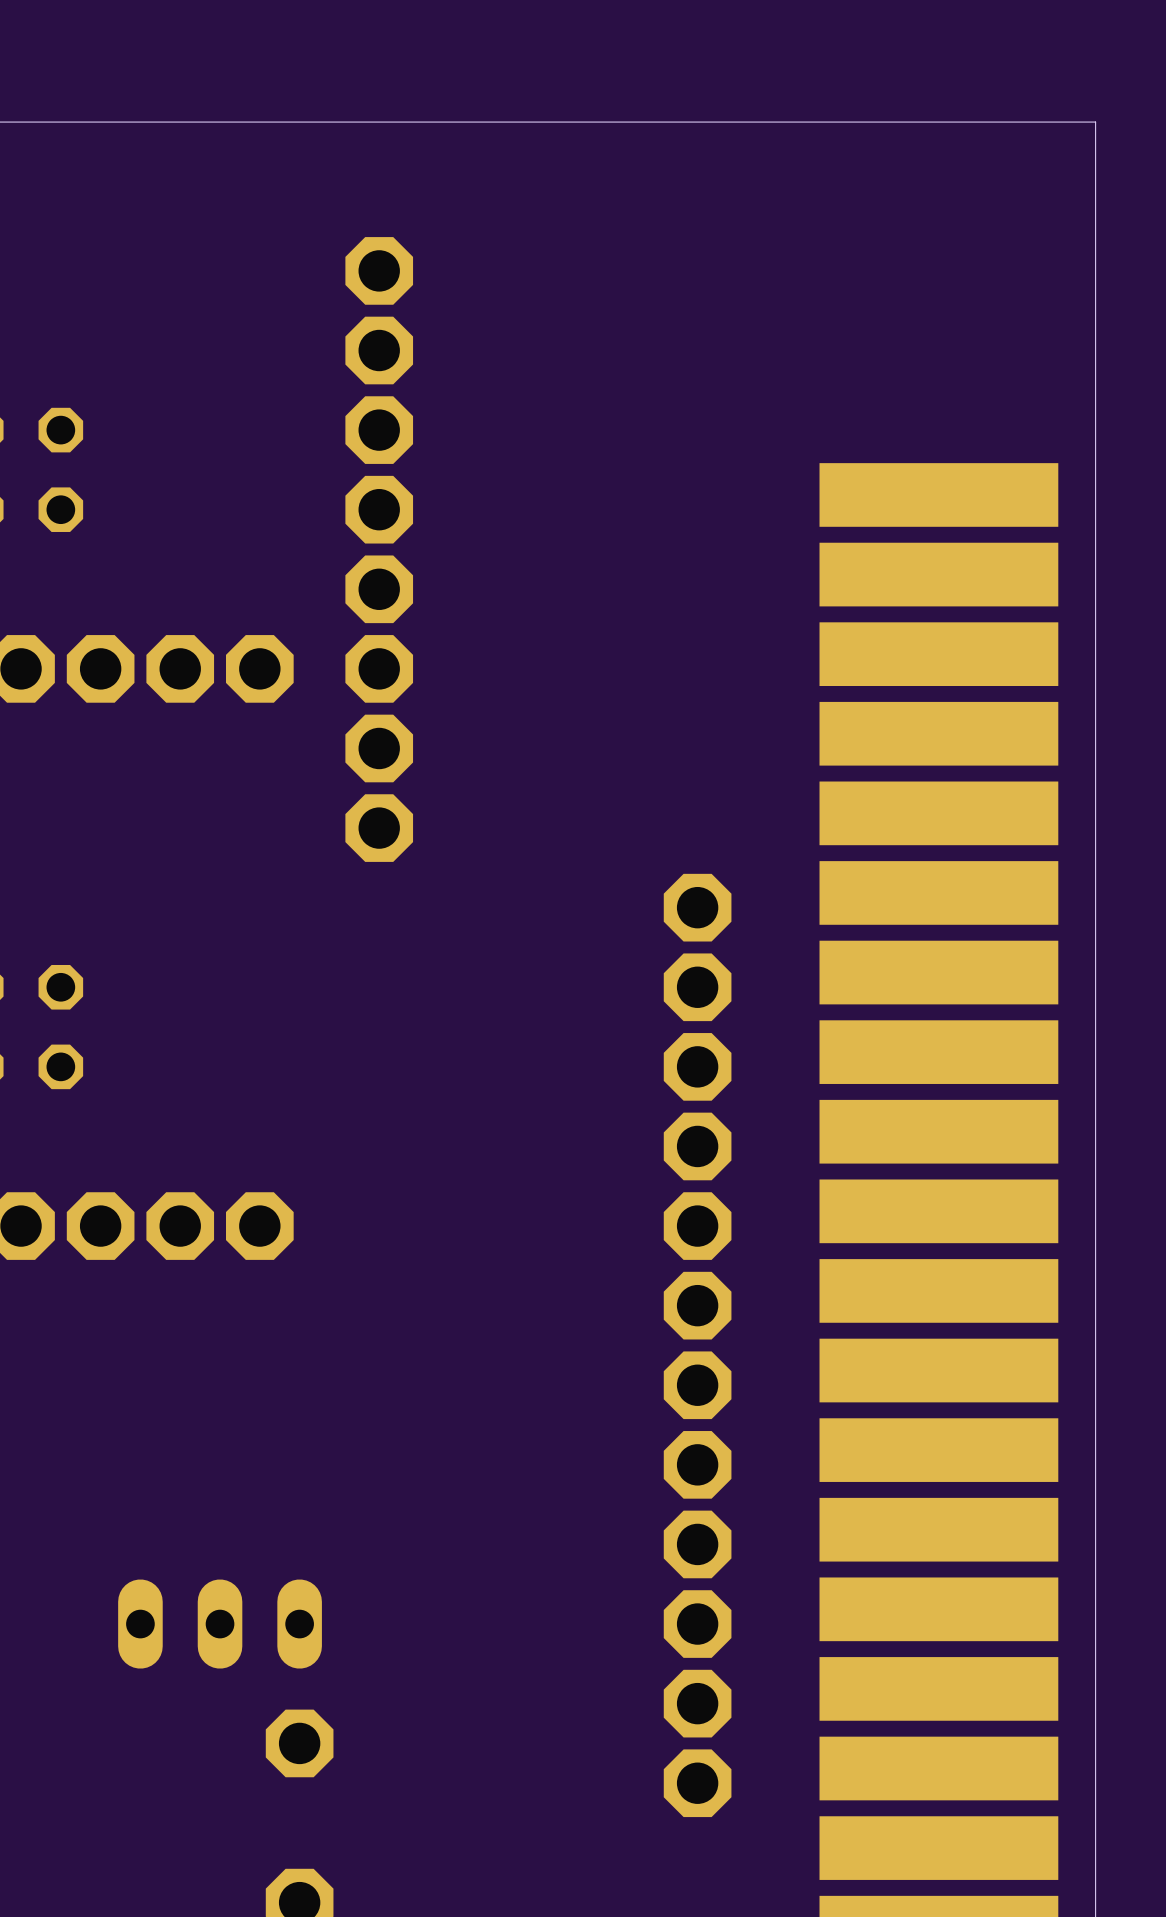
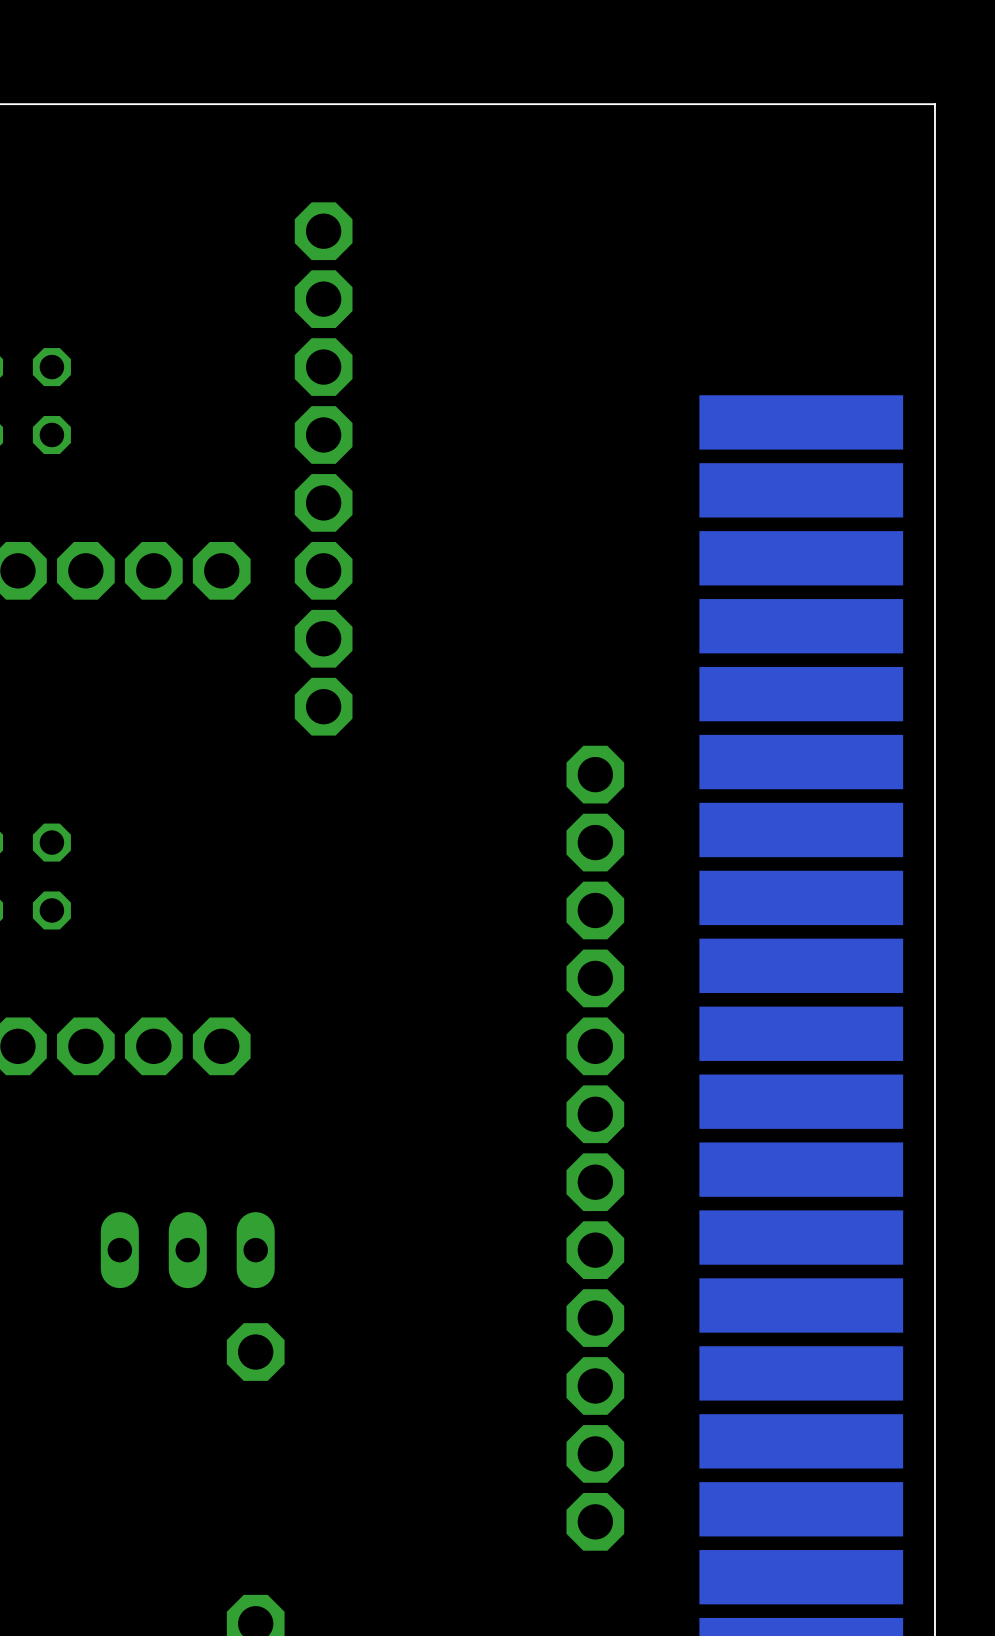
part position: (220, 1624) -> (187, 1250)
part position: (299, 1743) -> (255, 1352)

